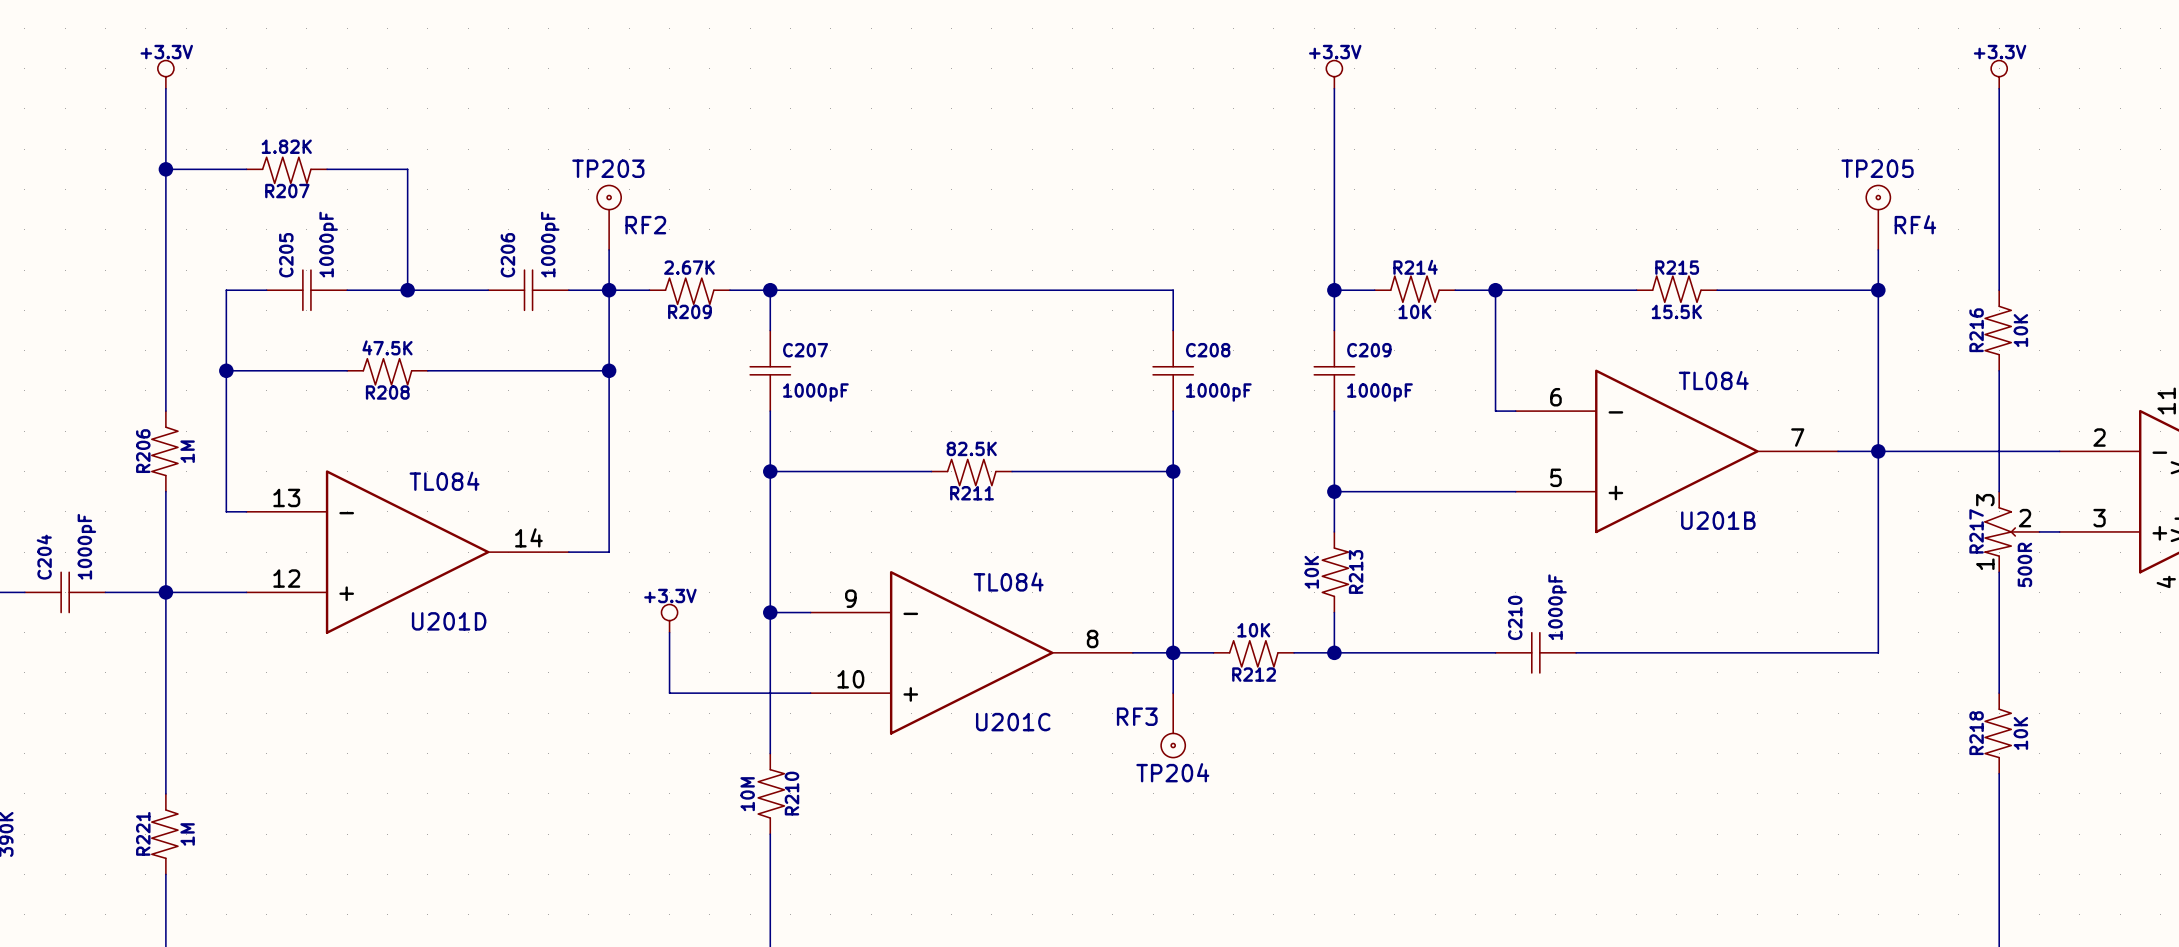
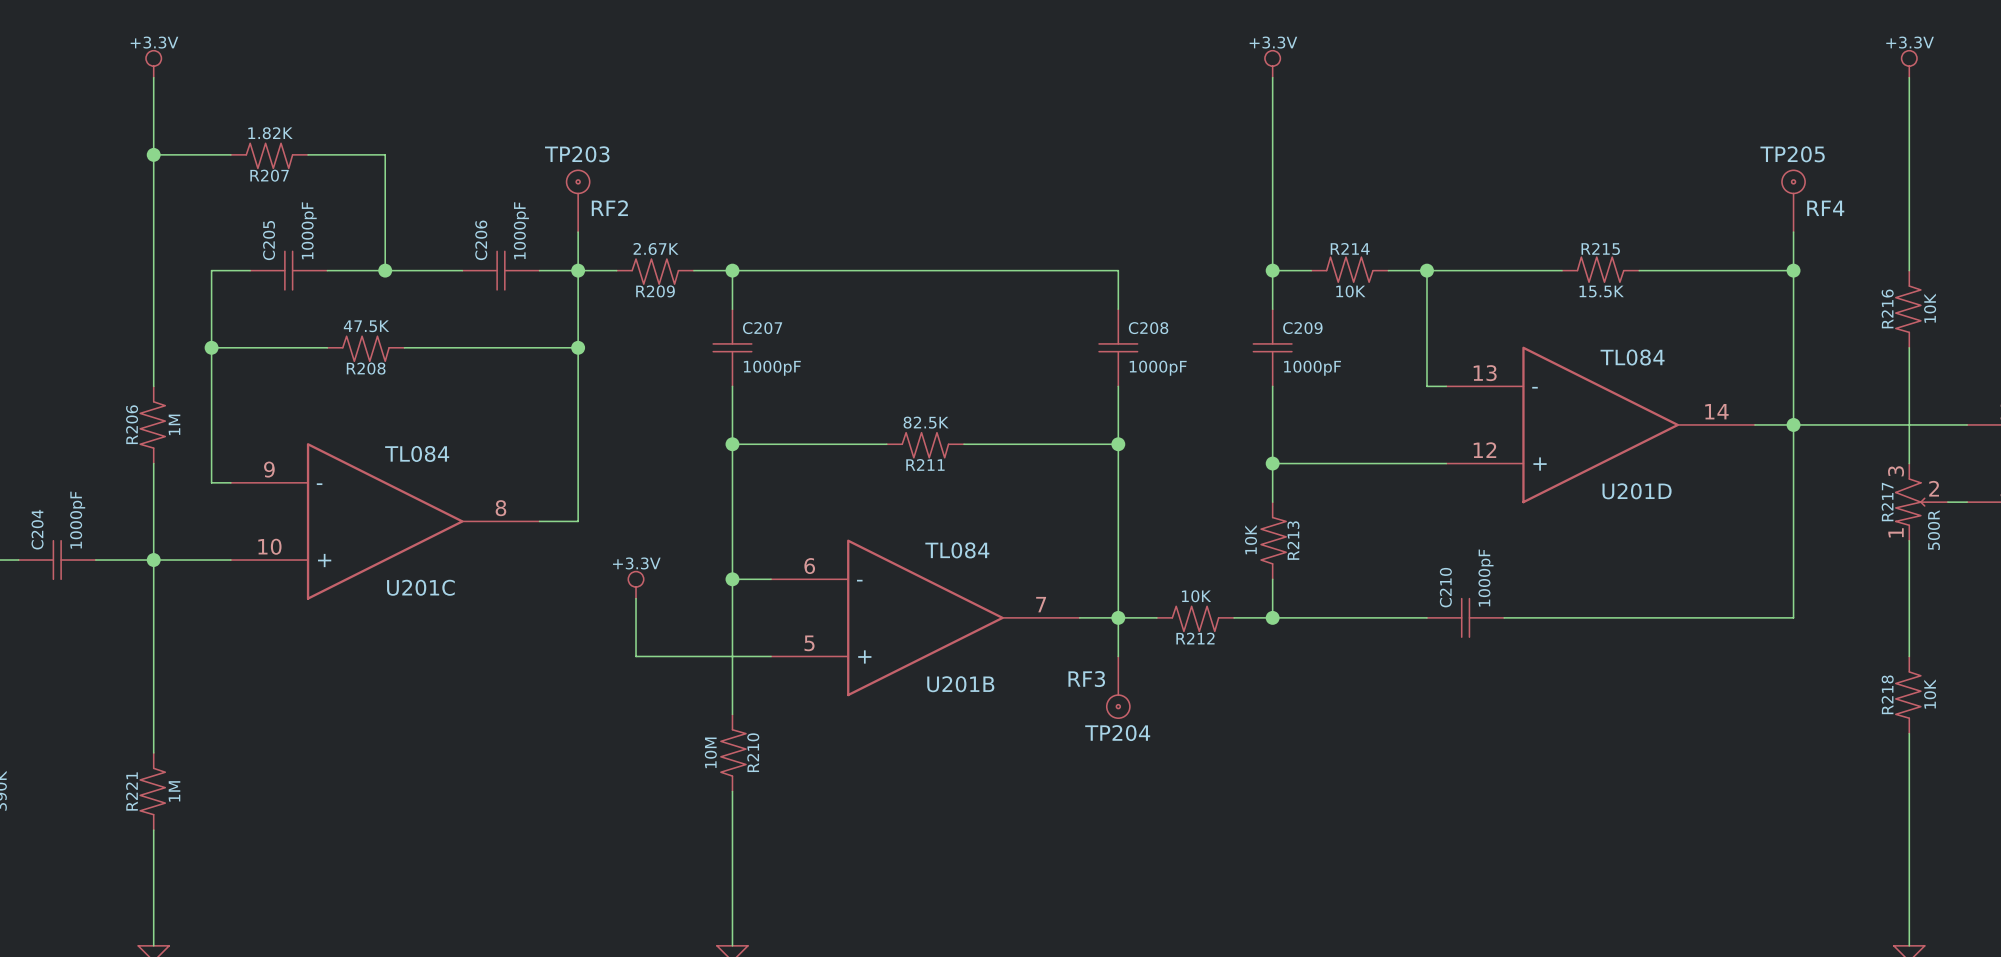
U201B position: (1676, 451) -> (925, 617)
U201D position: (407, 552) -> (1600, 424)
U201C position: (971, 652) -> (385, 521)

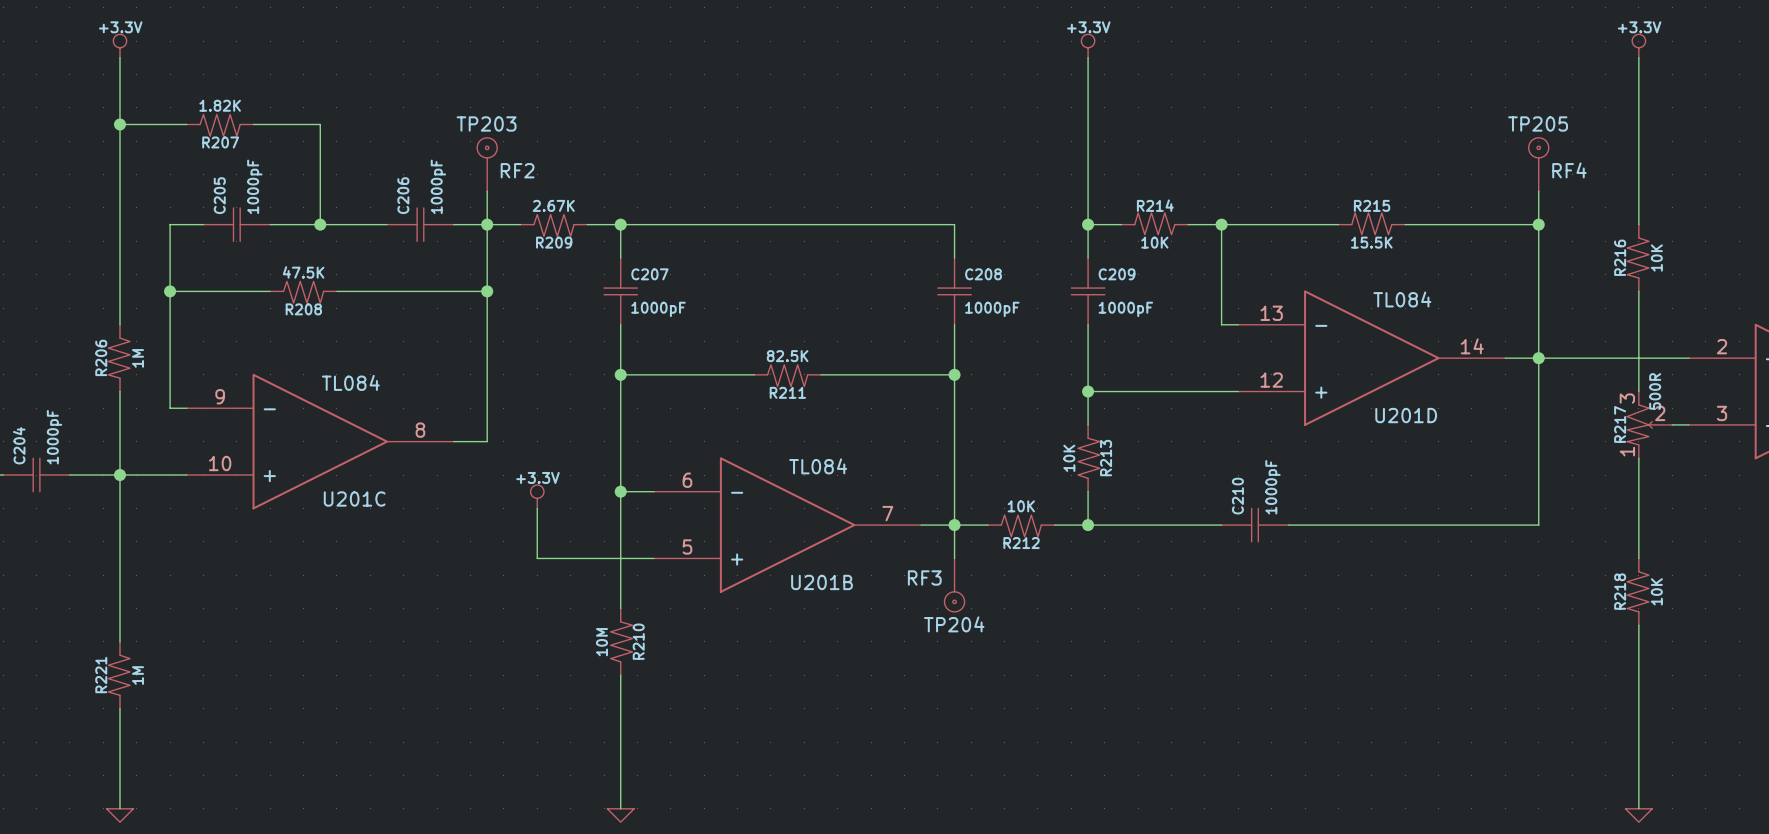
R217 value position: 500R (1933, 530) -> 500R (1655, 391)

